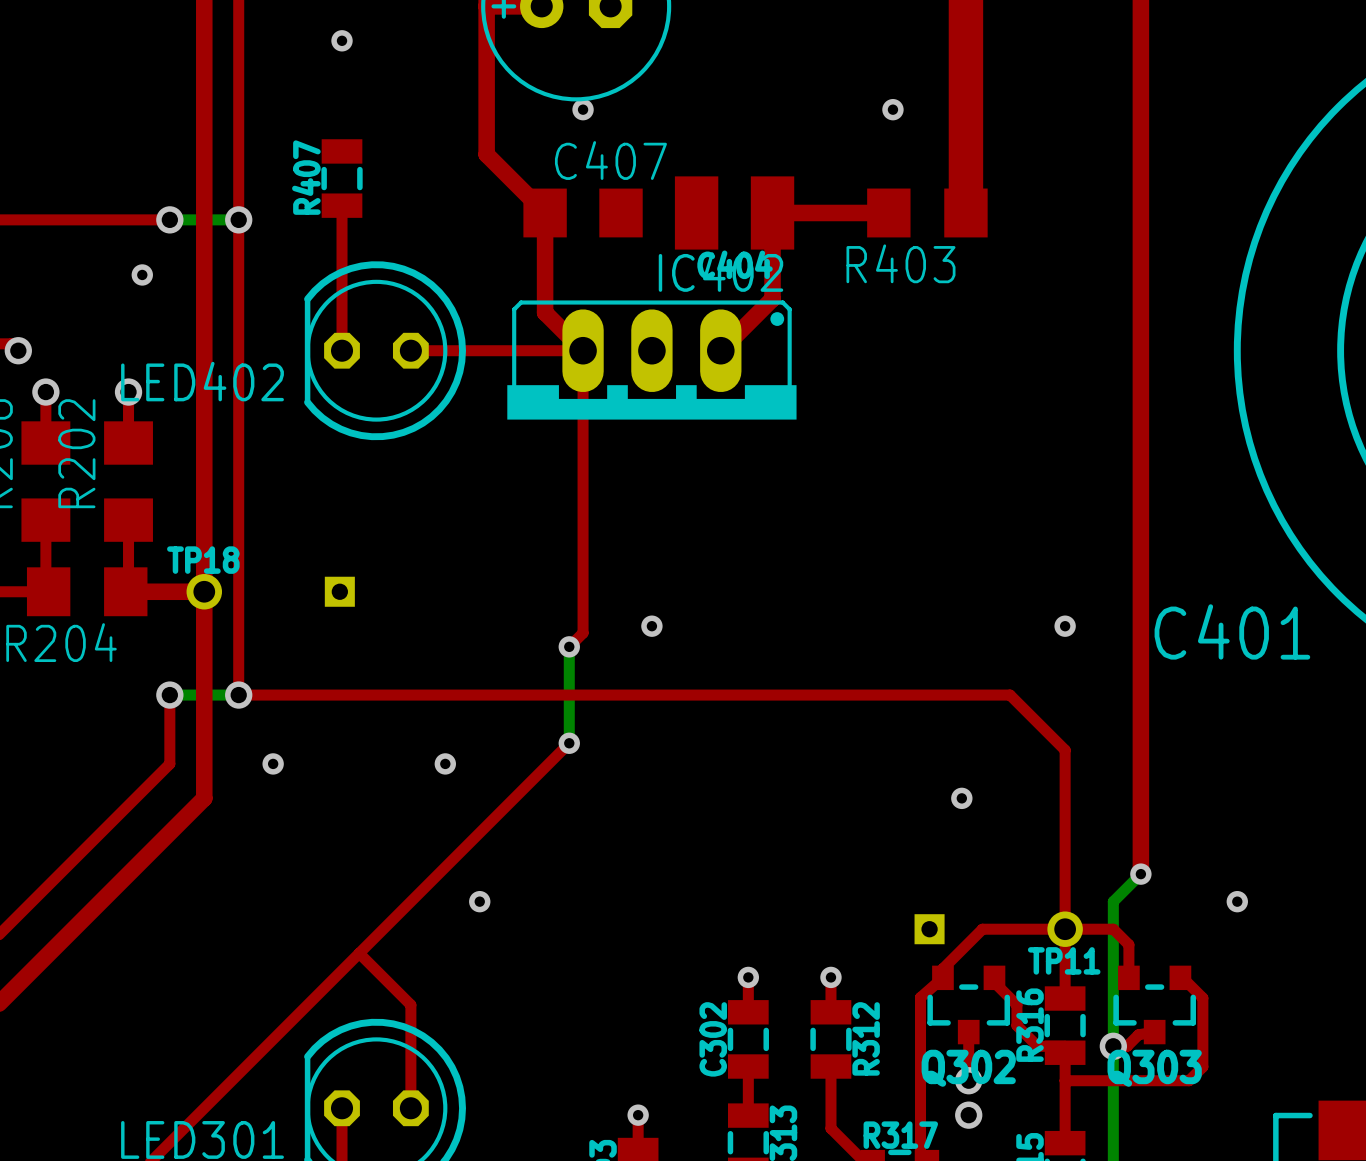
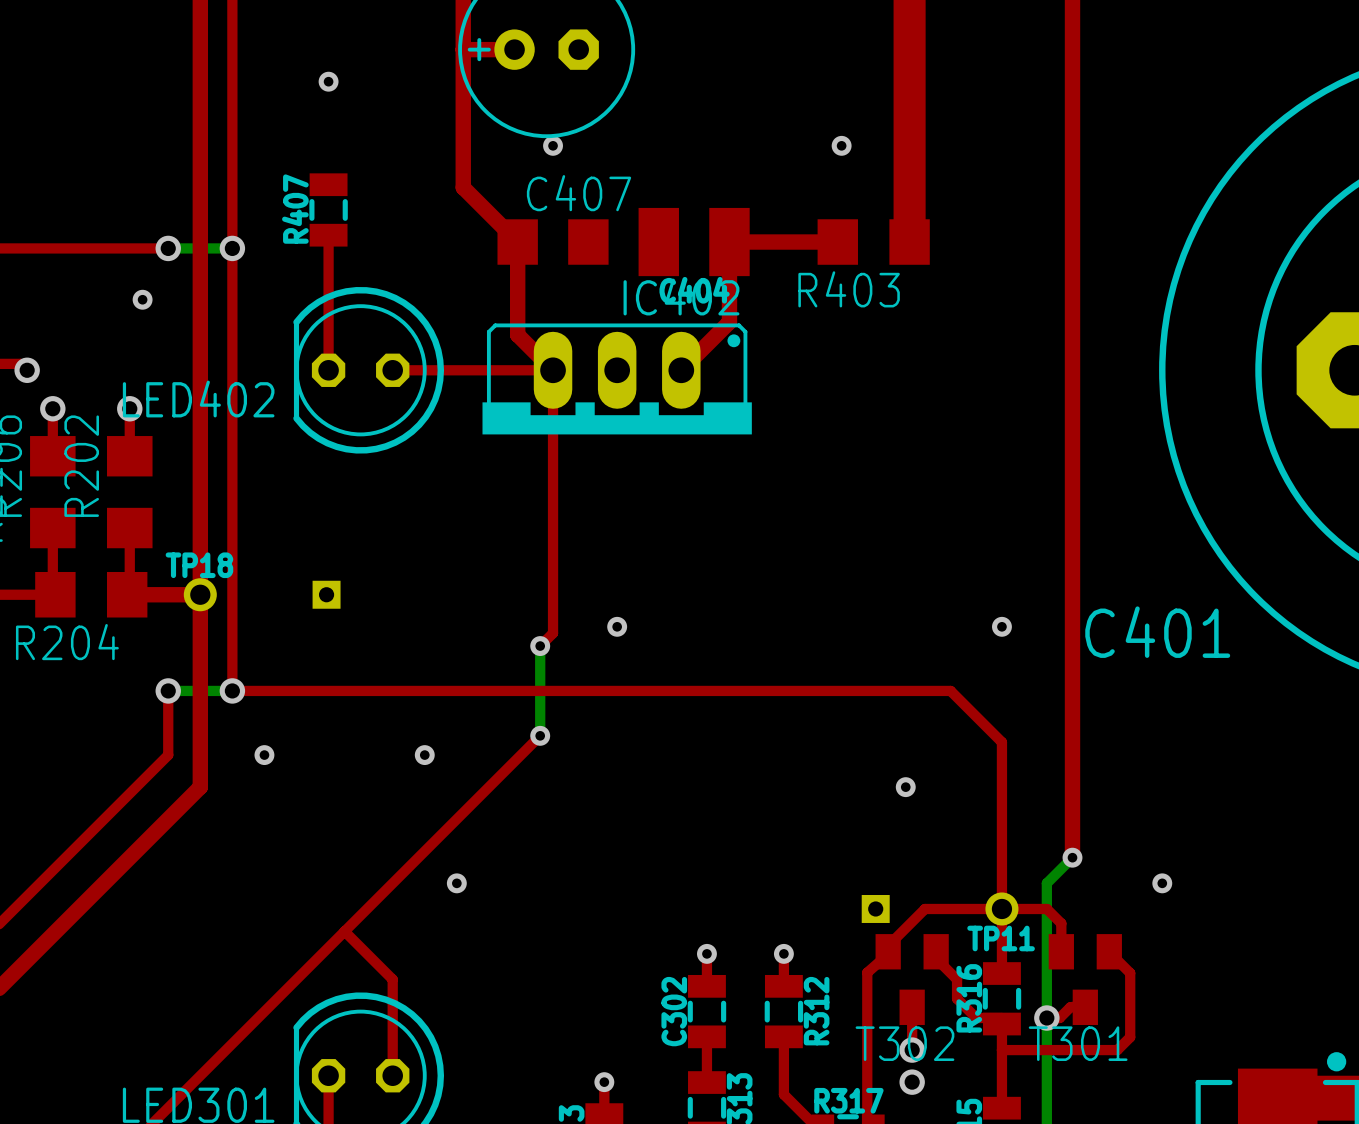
Q302: (968, 1004) -> none
T302: none -> (912, 979)
Q303: (1154, 1004) -> none
T301: none -> (1085, 979)

